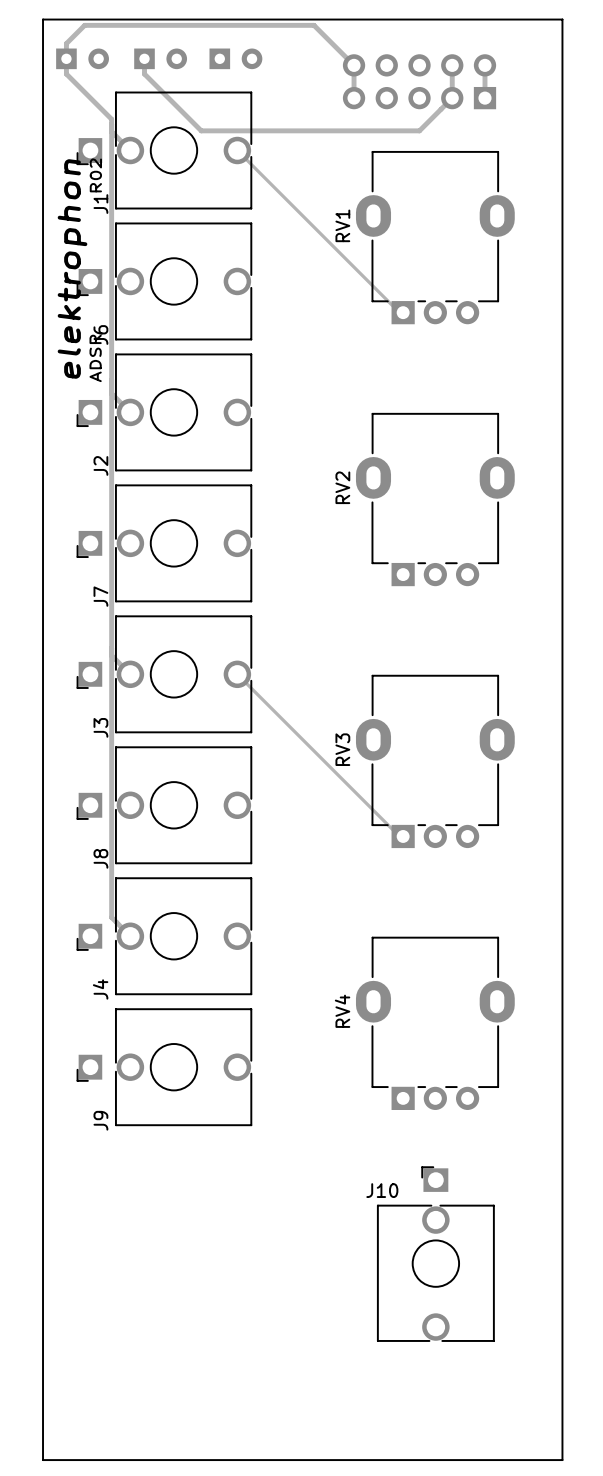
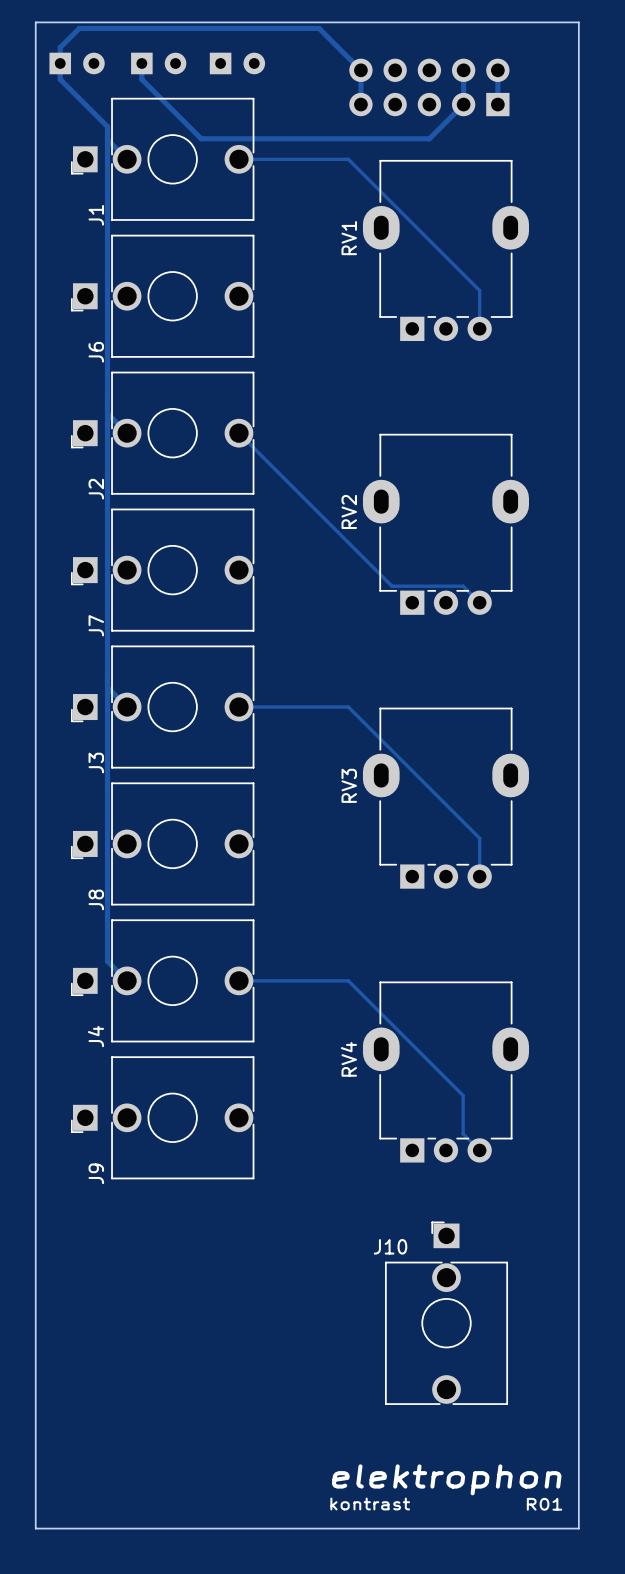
track: (237, 150) (399, 312) (403, 312) -> (238, 159) (348, 159) (479, 290) (479, 328)
drawing: [57, 158, 103, 383] -> none
track: none -> (238, 433) (392, 586) (463, 586) (479, 602)
track: (237, 674) (399, 836) (403, 836) -> (238, 707) (348, 707) (479, 838) (479, 876)
track: none -> (238, 980) (348, 980) (463, 1095) (463, 1133) (479, 1150)
drawing: none -> [330, 1464, 563, 1511]

